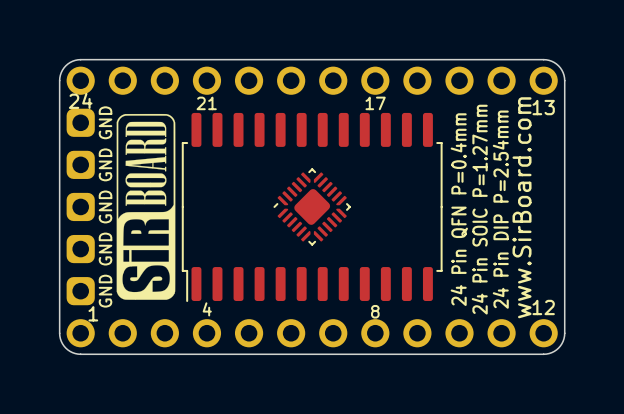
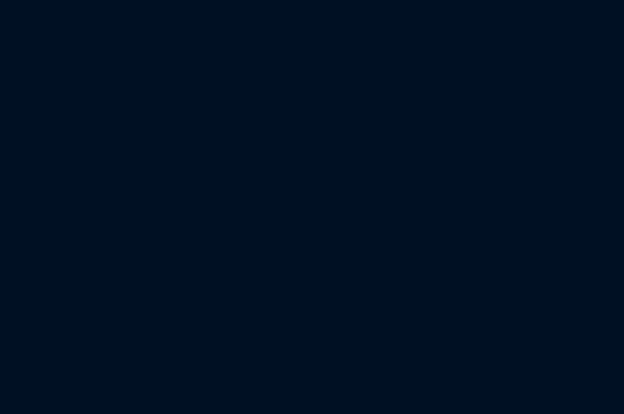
board edge: (80, 59) (543, 59) (554, 62) (561, 70) (564, 80) (564, 333) (561, 343) (554, 351) (543, 354) (80, 354) (70, 351) (62, 343) (59, 333) (59, 80) (61, 72) (65, 65) (72, 61) (80, 59) -> none
part: (312, 80) -> none
text: 24 (80, 100) -> none
text: 21 (206, 103) -> none
text: 17 (375, 103) -> none
text: 13 (543, 107) -> none
drawing: [116, 113, 176, 300] -> none
text: GND (105, 122) -> none
text: GND (105, 164) -> none
part: (80, 206) -> none
text: GND (105, 206) -> none
part: (312, 206) -> none
part: (312, 207) -> none
text: www.SirBoard.com (522, 207) -> none
text: 24 Pin QFN P=0.4mm (459, 209) -> none
text: 24 Pin SOIC P=1.27mm (479, 209) -> none
text: 24 Pin DIP P=2.54mm (500, 209) -> none
text: GND (105, 249) -> none
text: GND (105, 291) -> none
text: 12 (543, 307) -> none
text: 4 (207, 309) -> none
text: 8 (375, 311) -> none
text: 1 (93, 313) -> none
part: (312, 333) -> none

